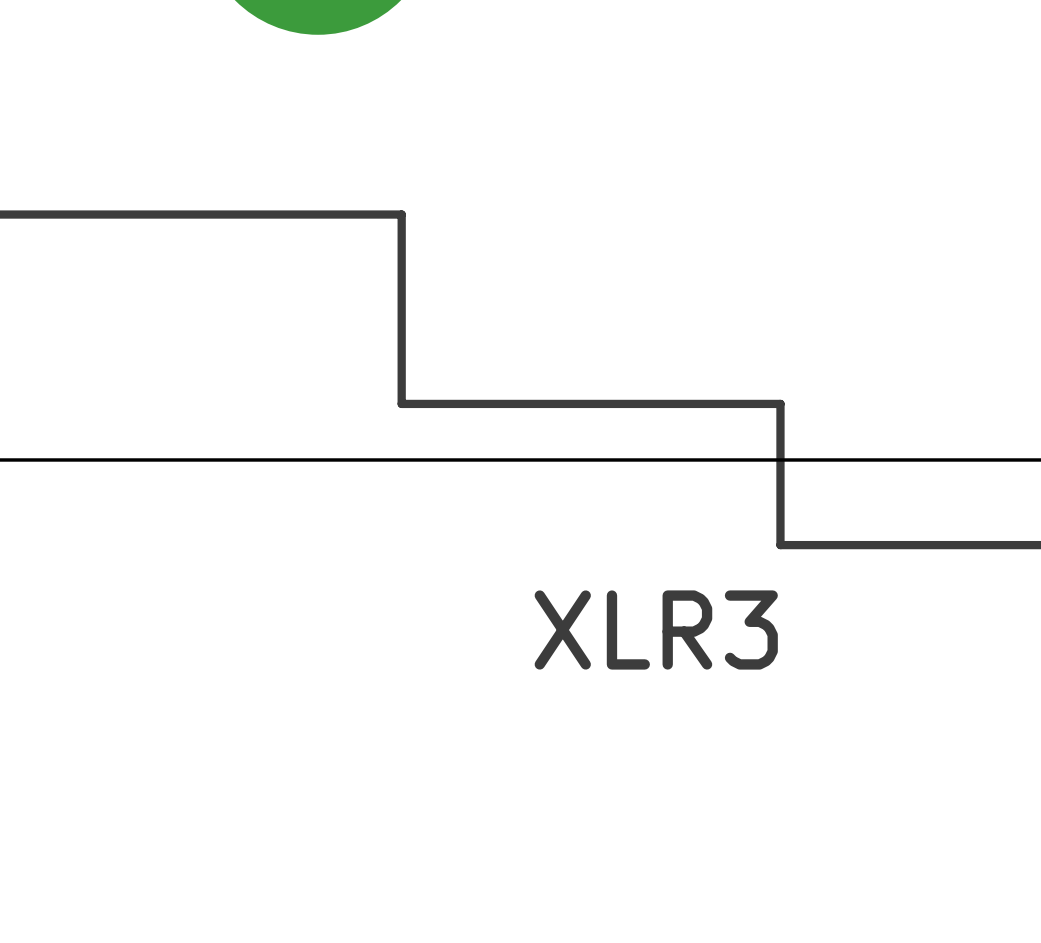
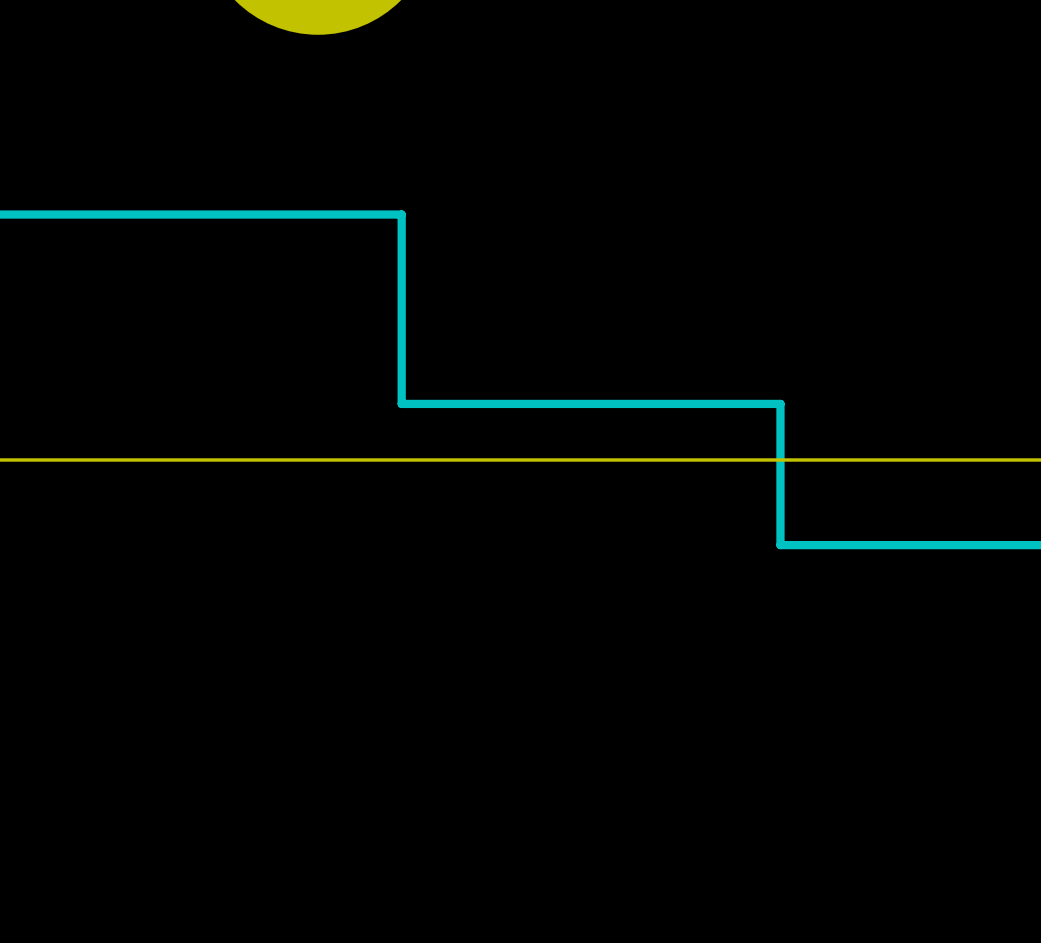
part value: XLR3 (656, 630) -> none

